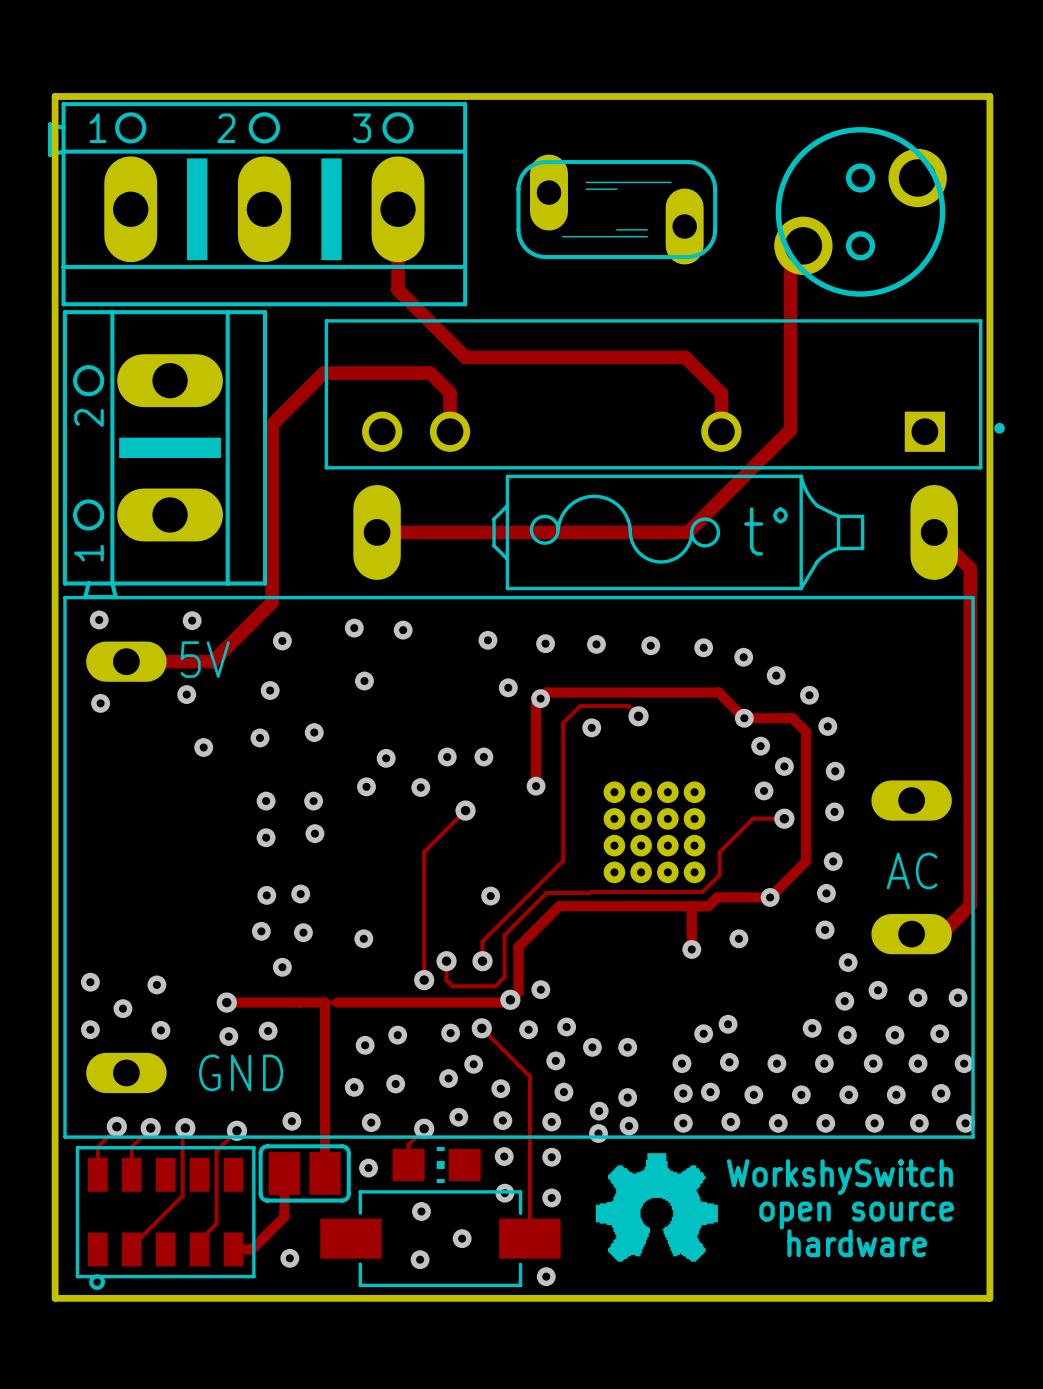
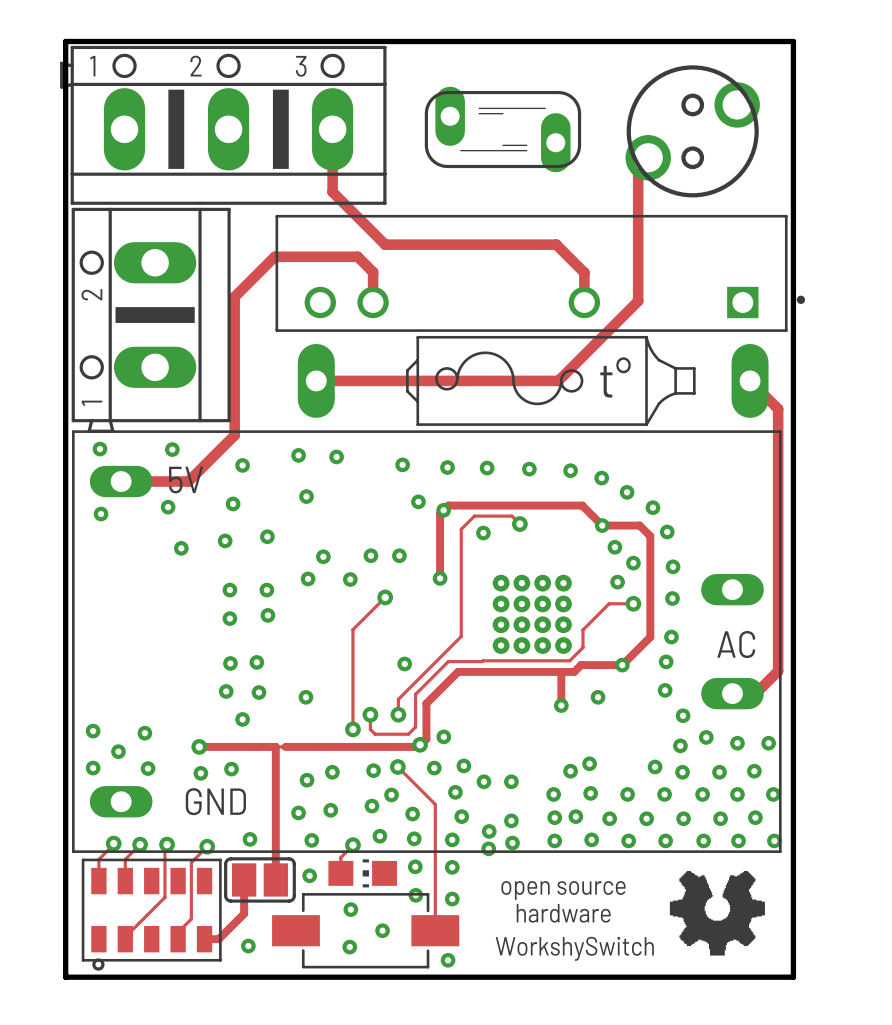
drawing: [595, 1153, 718, 1262] -> none
drawing position: (656, 1160) -> (717, 949)
drawing: none -> [669, 871, 765, 956]
drawing position: (656, 1167) -> (717, 944)
drawing position: (656, 1168) -> (717, 943)
drawing position: (656, 1170) -> (717, 942)
drawing position: (656, 1172) -> (717, 940)
drawing position: (656, 1175) -> (717, 938)
text position: WorkshySwitch (839, 1177) -> WorkshySwitch (574, 948)
drawing position: (656, 1183) -> (717, 931)
drawing position: (656, 1190) -> (717, 926)
text position: open source (856, 1215) -> open source (563, 890)
text position: hardware (857, 1243) -> hardware (563, 913)
drawing position: (625, 1254) -> (741, 876)
drawing position: (675, 1255) -> (703, 875)

